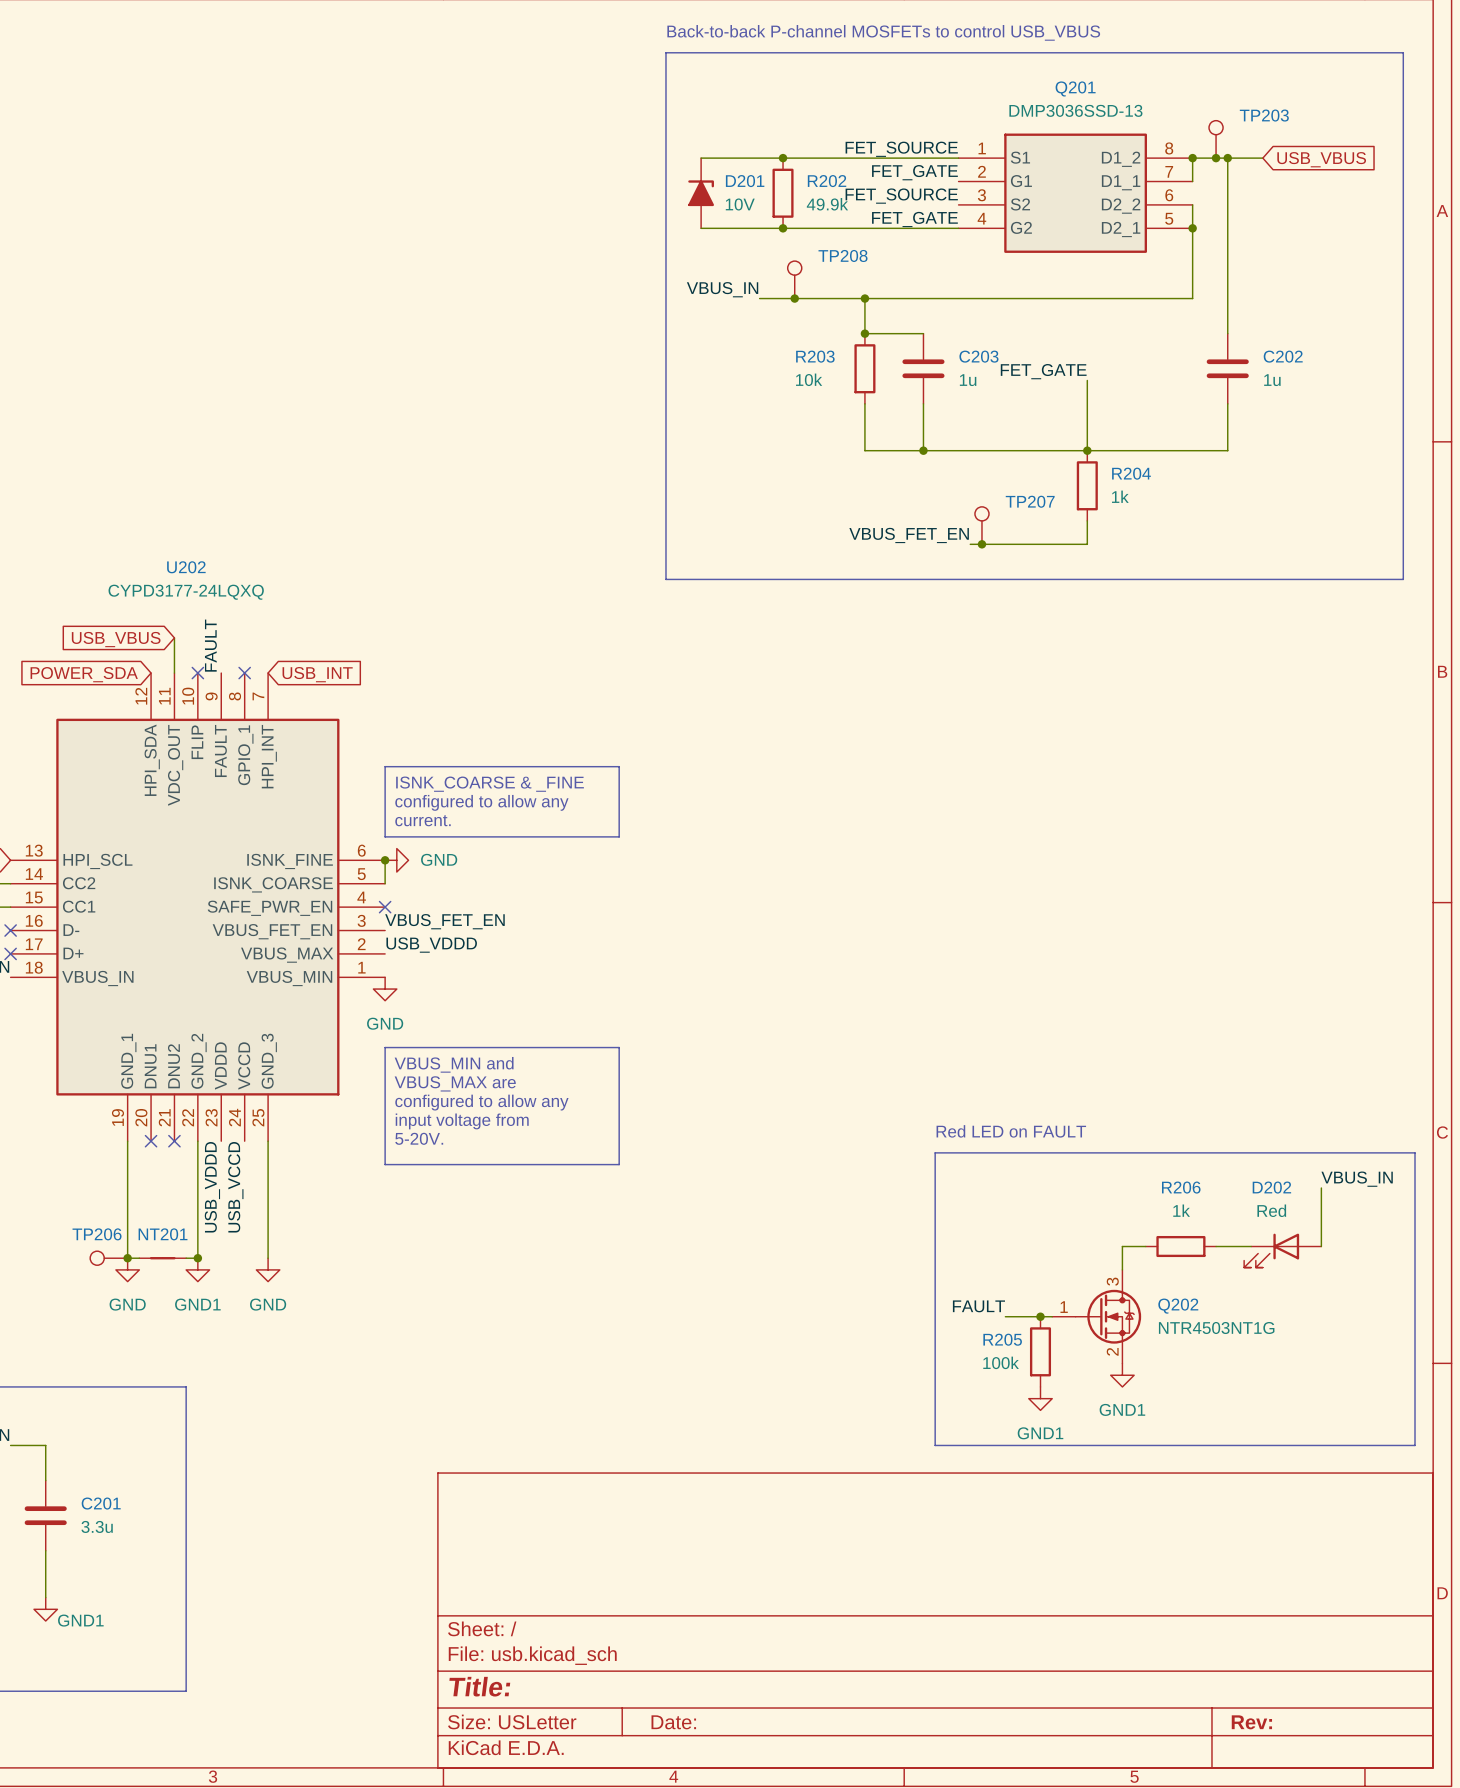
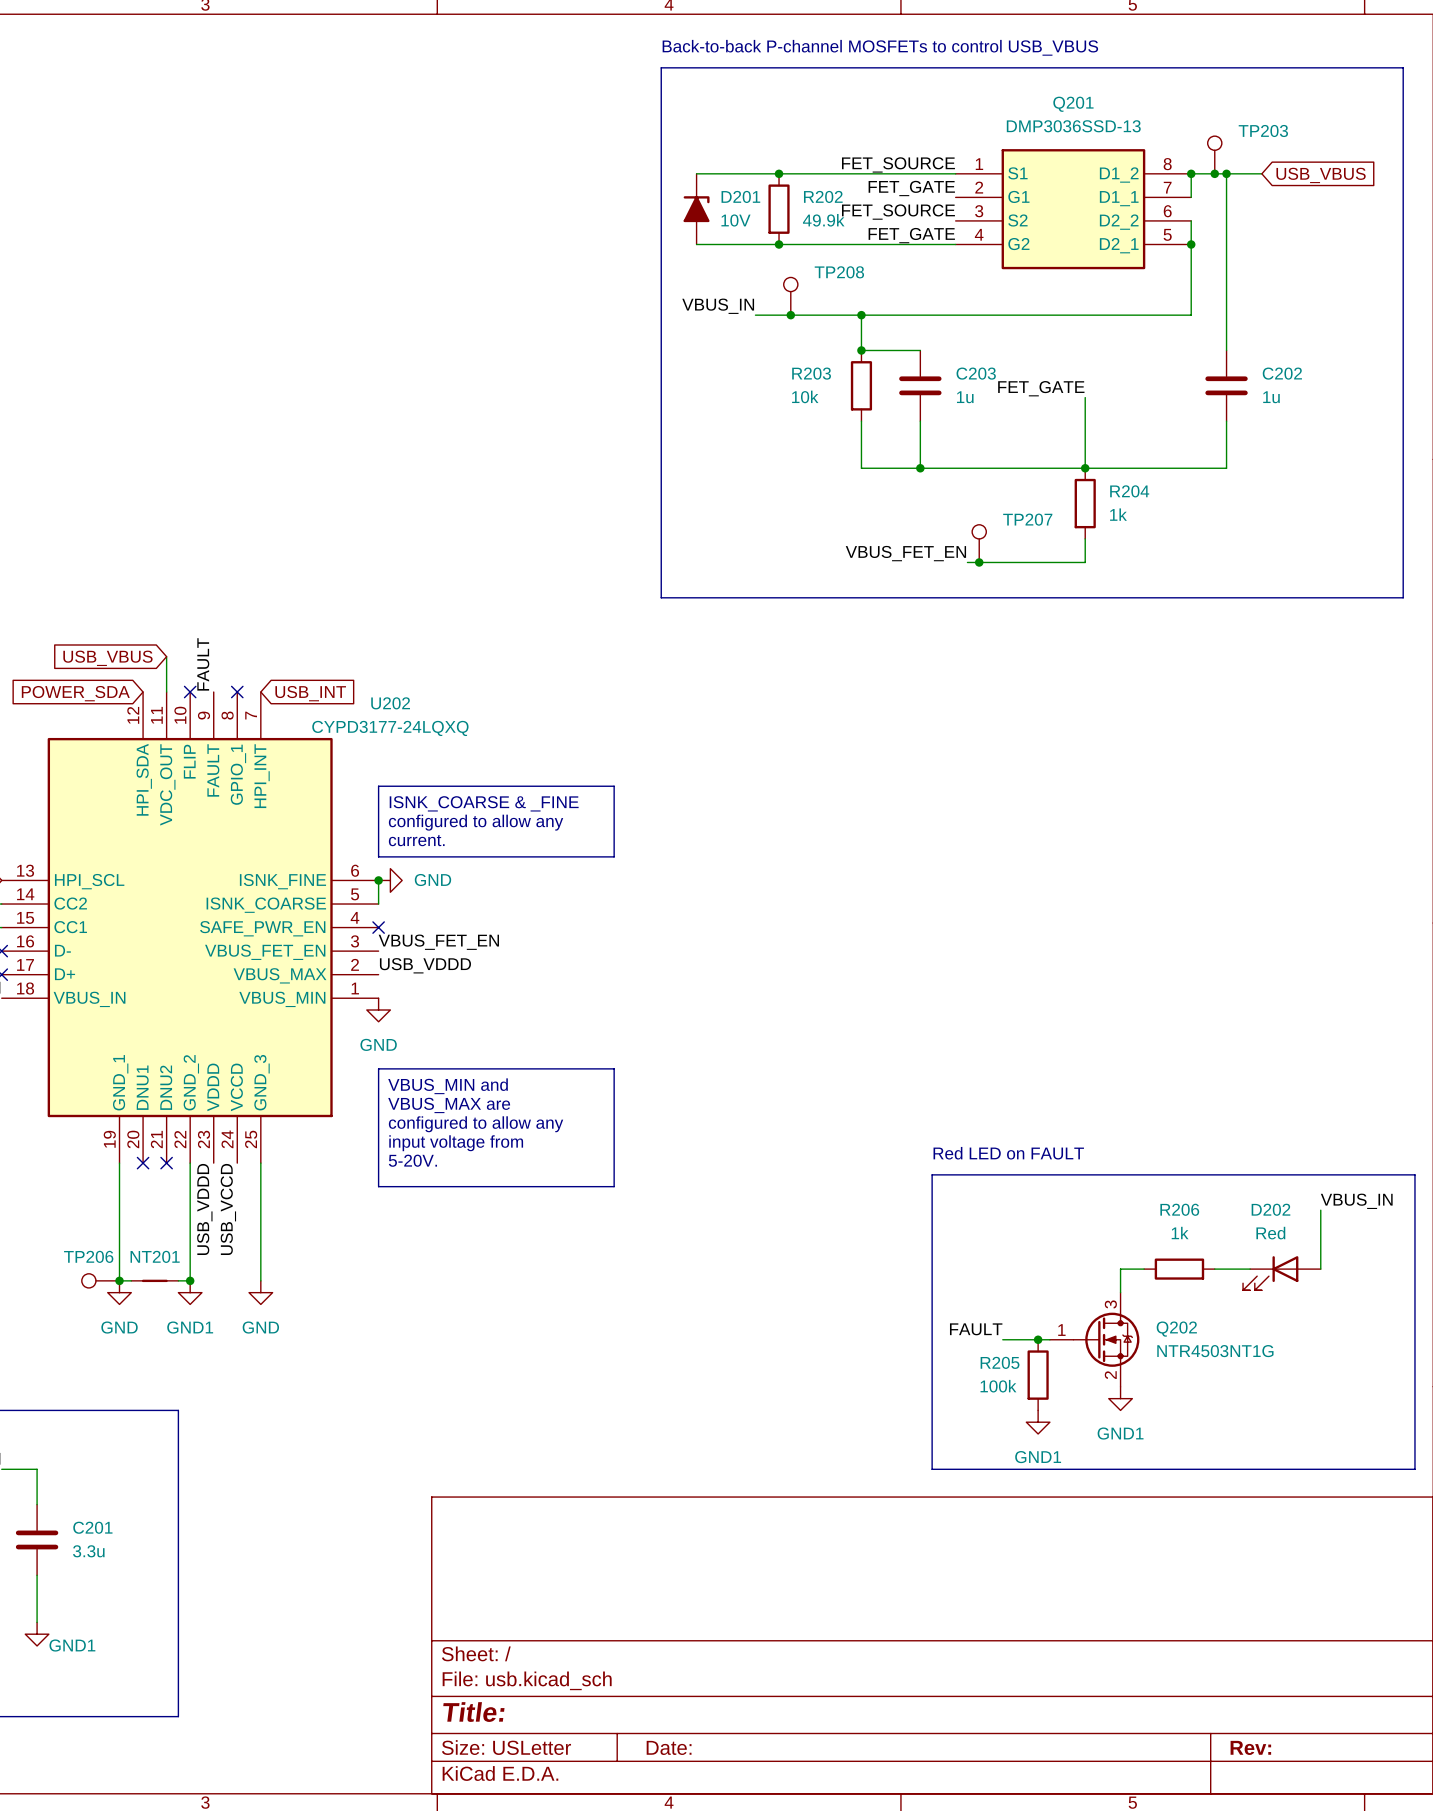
U202 name position: U202 (186, 567) -> U202 (390, 703)
U202 value position: CYPD3177-24LQXQ (186, 592) -> CYPD3177-24LQXQ (390, 728)

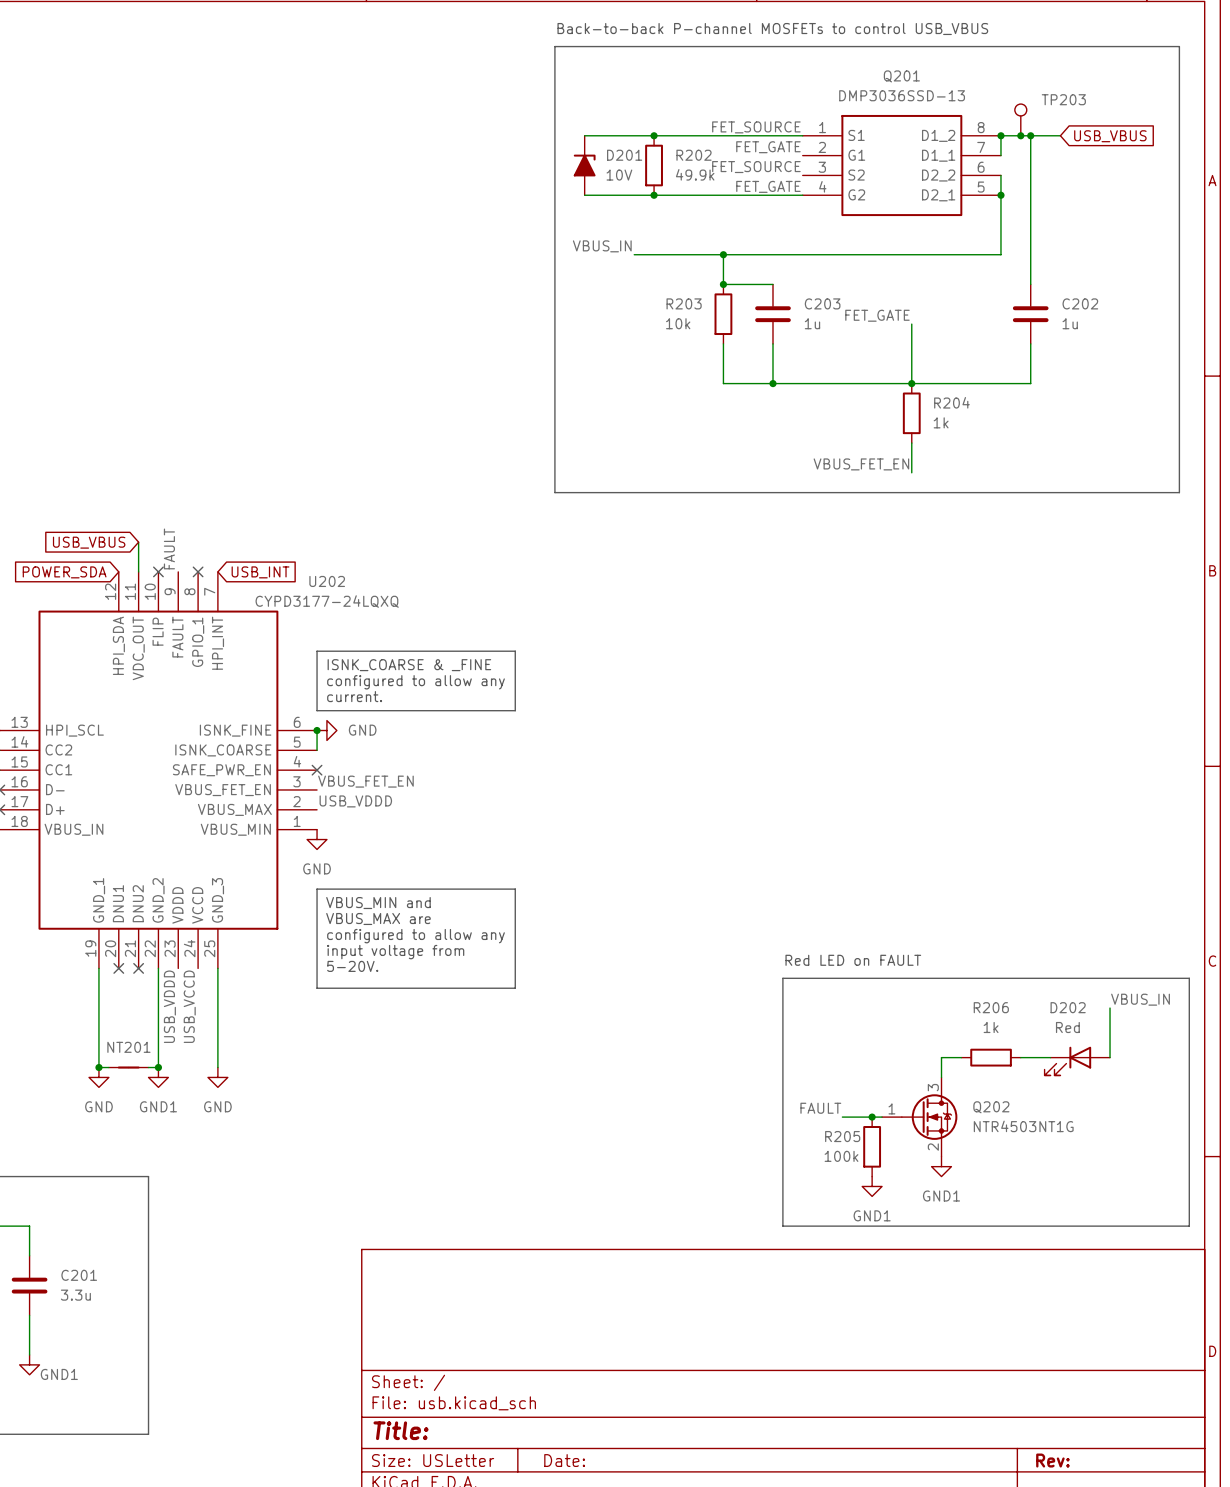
TP208: (790, 296) -> none
junction: (790, 315) -> none
TP207: (979, 543) -> none
label position: VBUS_FET_EN (905, 553) -> VBUS_FET_EN (861, 464)
wire: (967, 562) (1085, 562) -> (911, 472) (911, 462)
junction: (979, 562) -> none
TP206: (100, 1280) -> none

